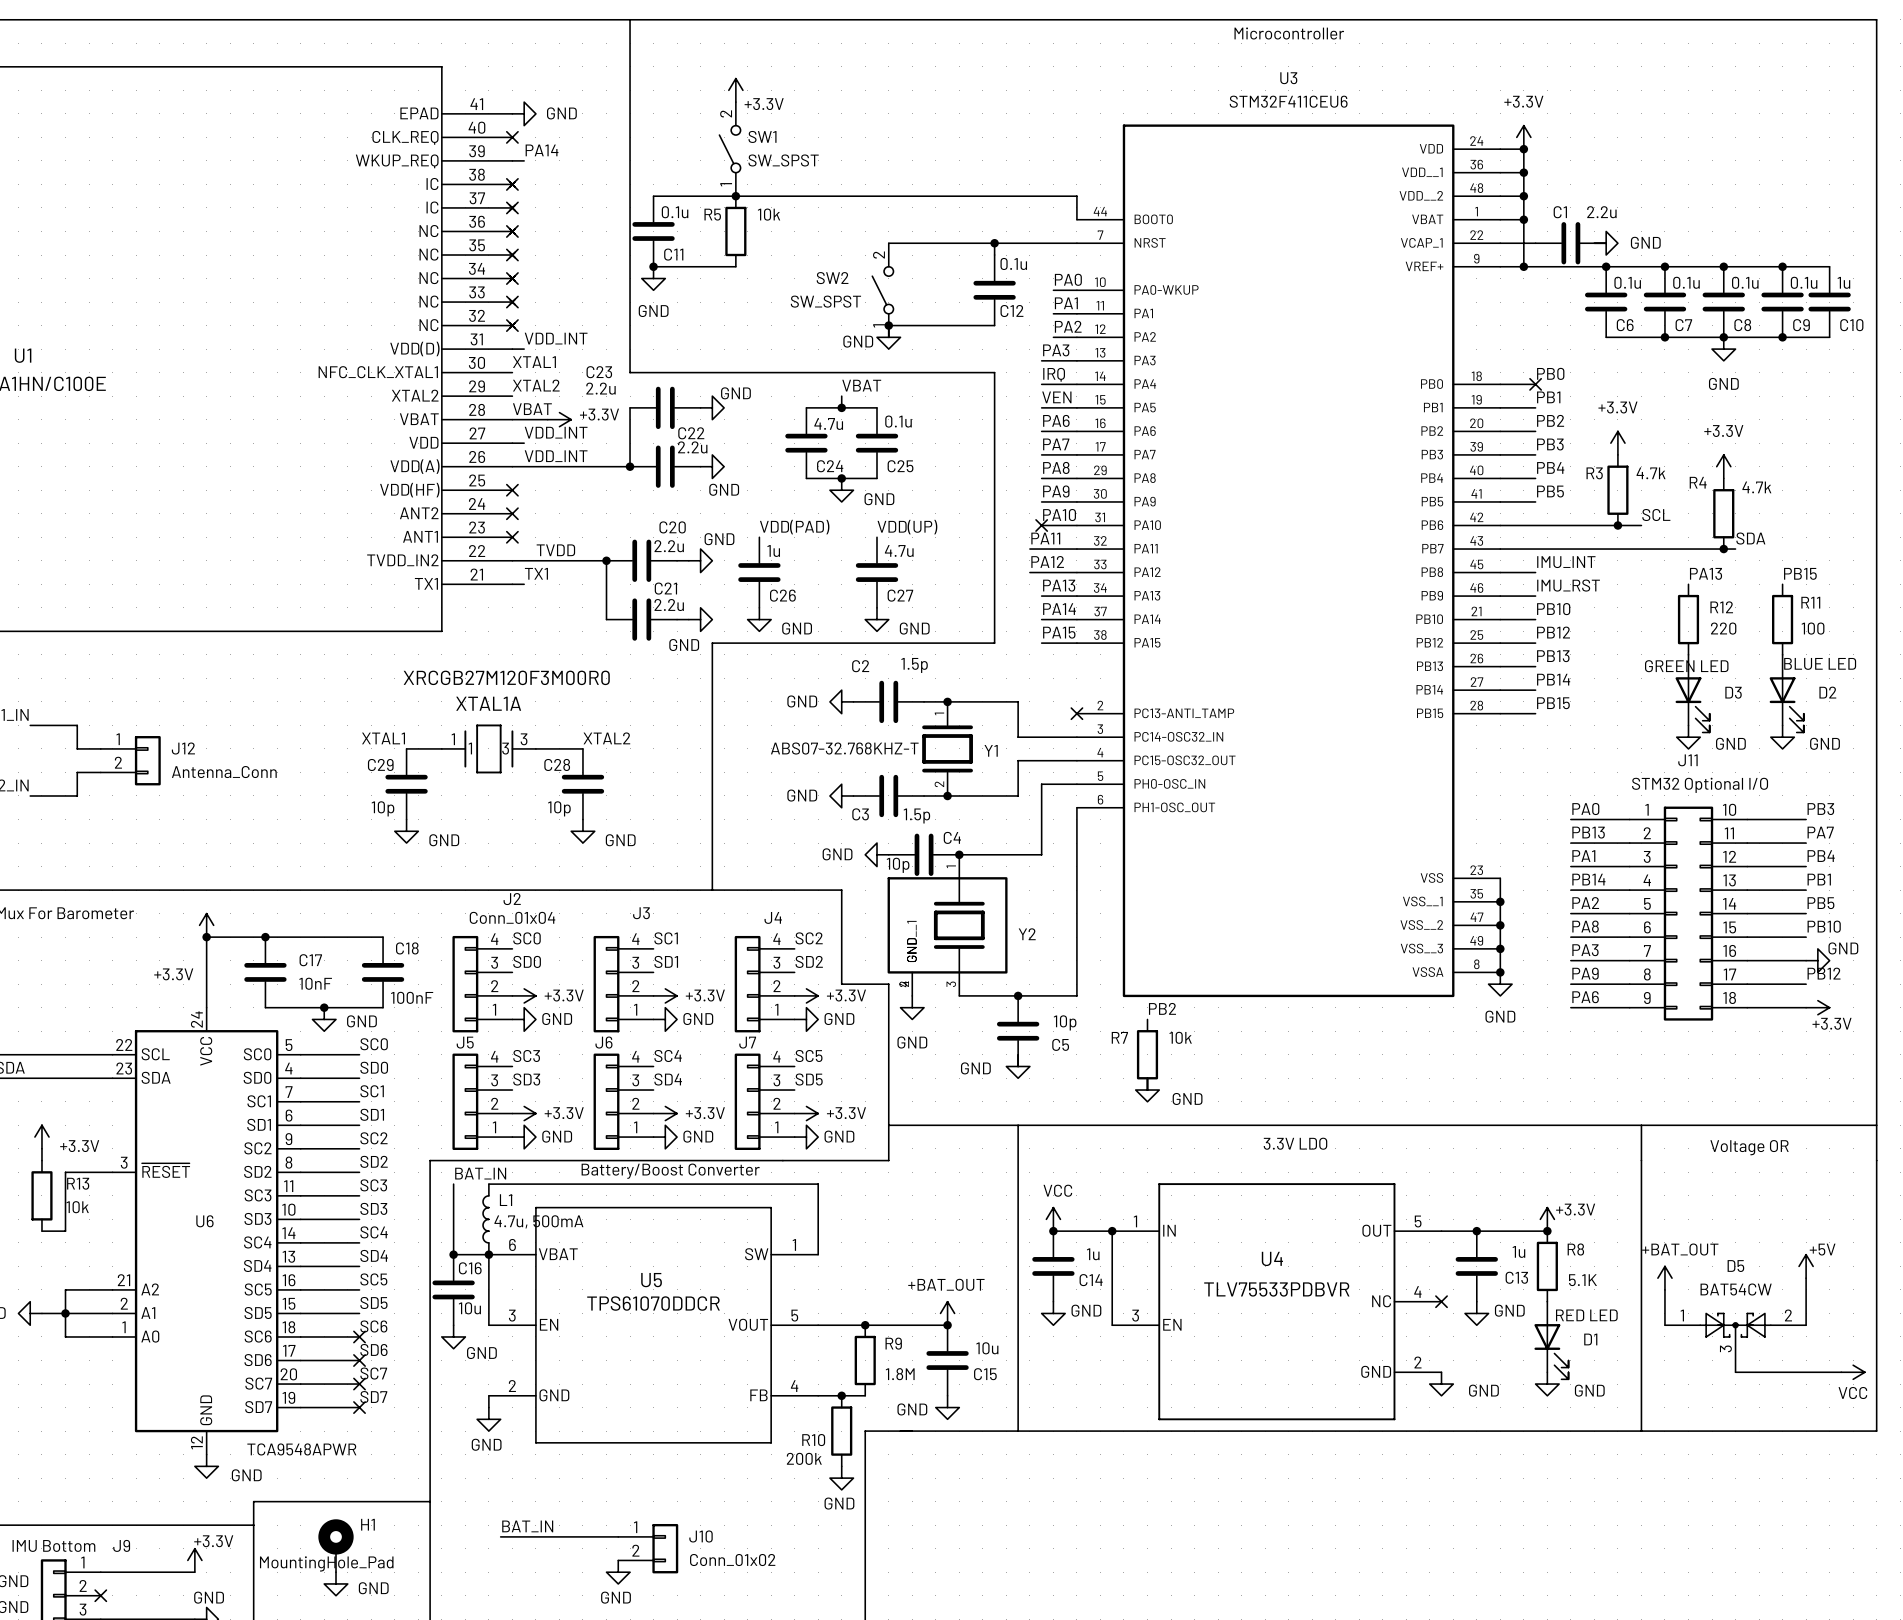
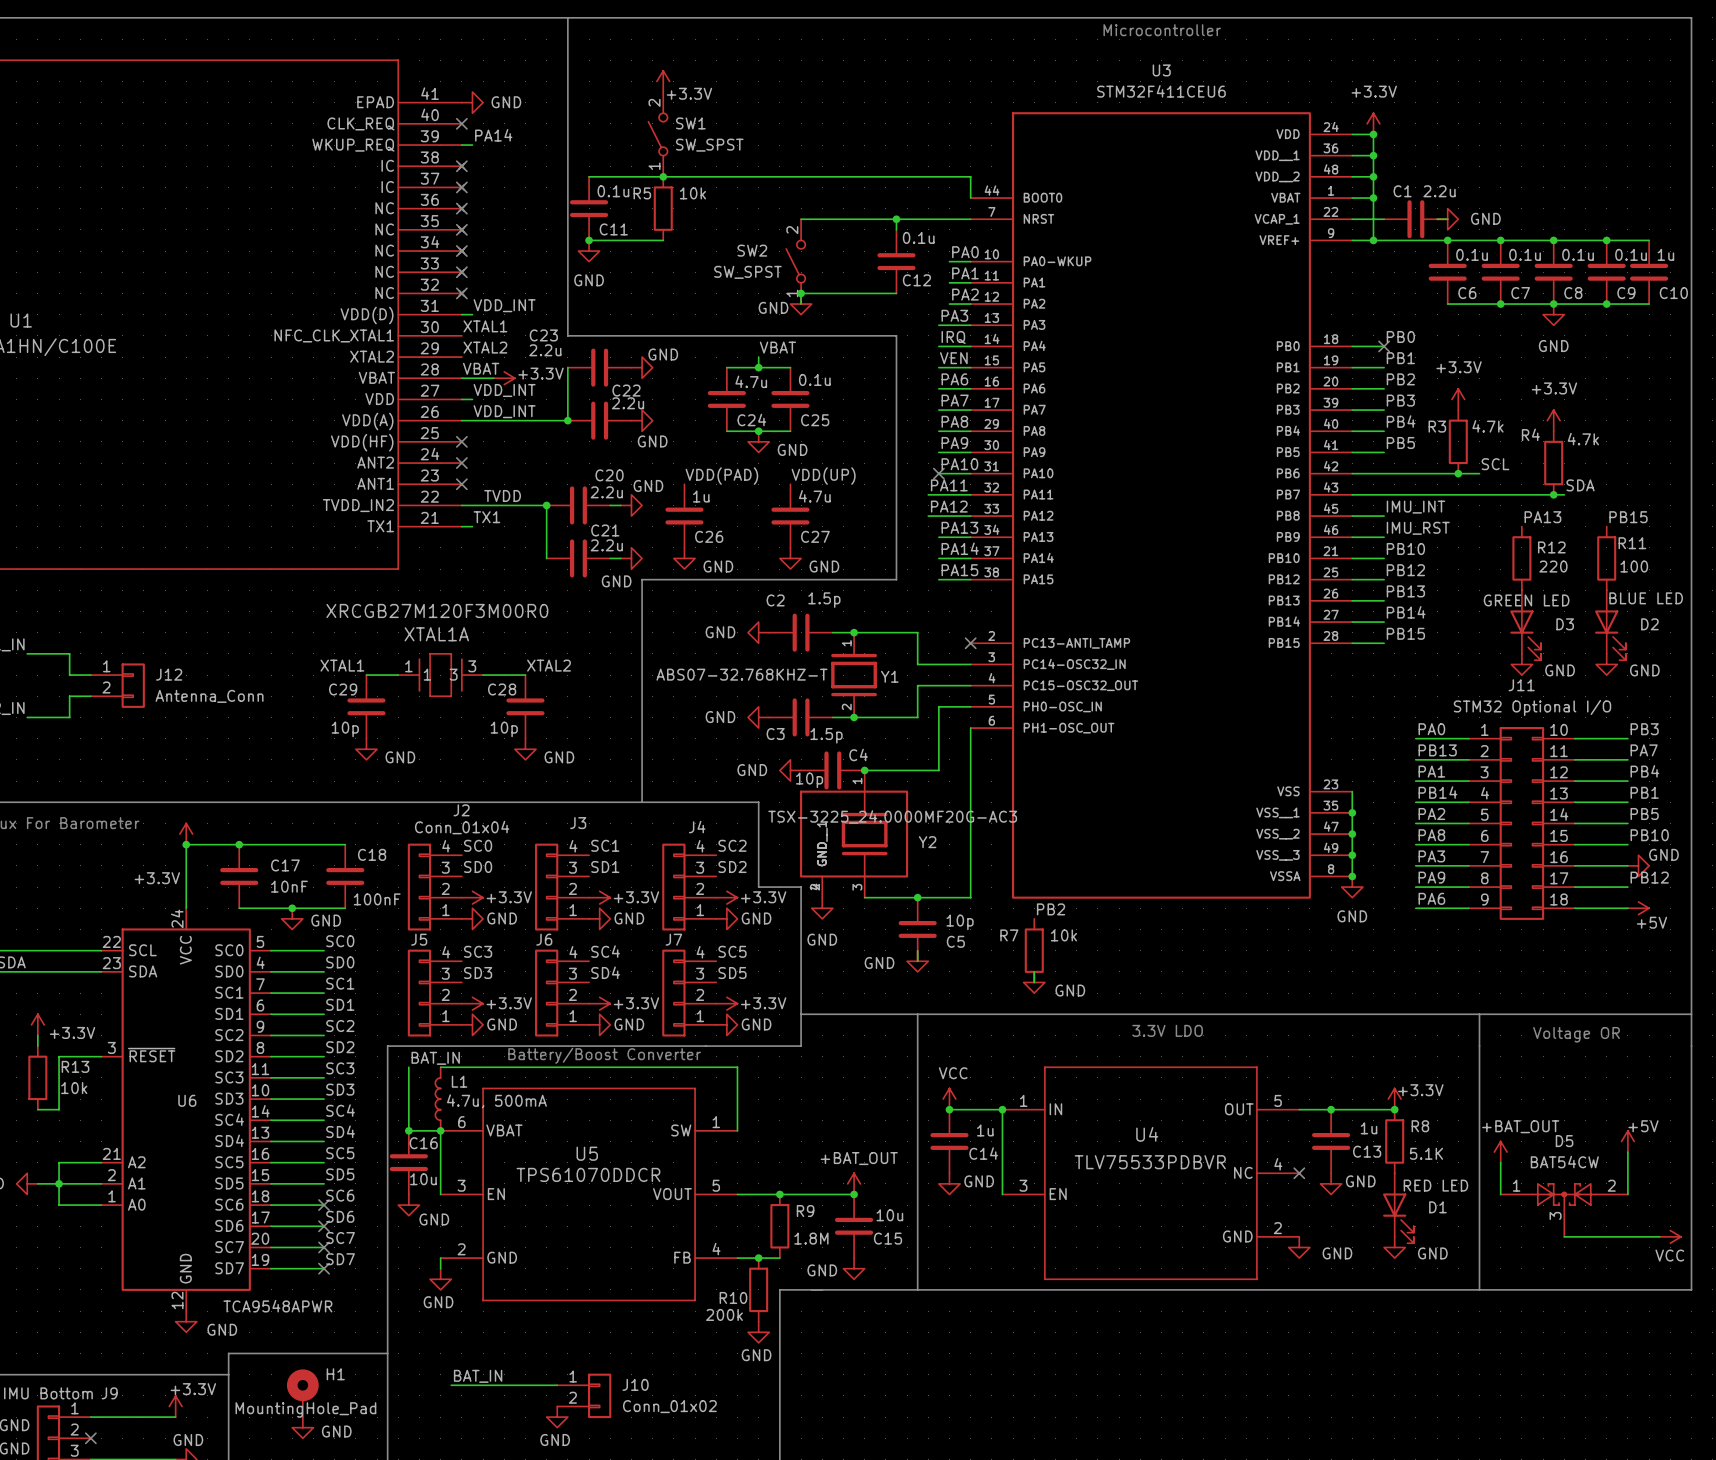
Y2 value: none -> TSX-3225_24.0000MF20G-AC3 (892, 816)
power symbol: +3.3V (1817, 1007) -> +5V (1638, 908)

